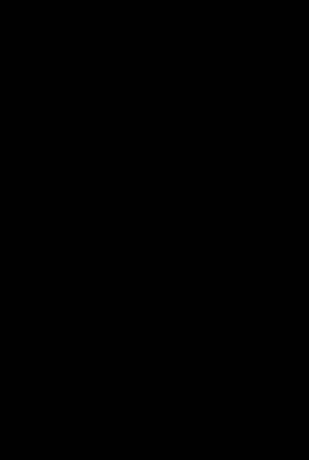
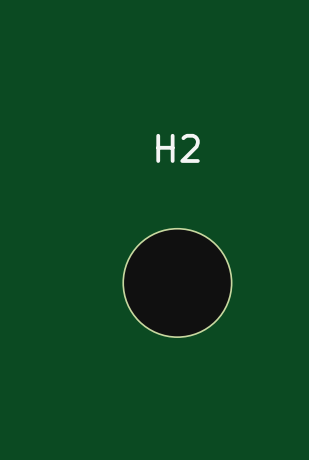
H2: none -> (177, 282)

